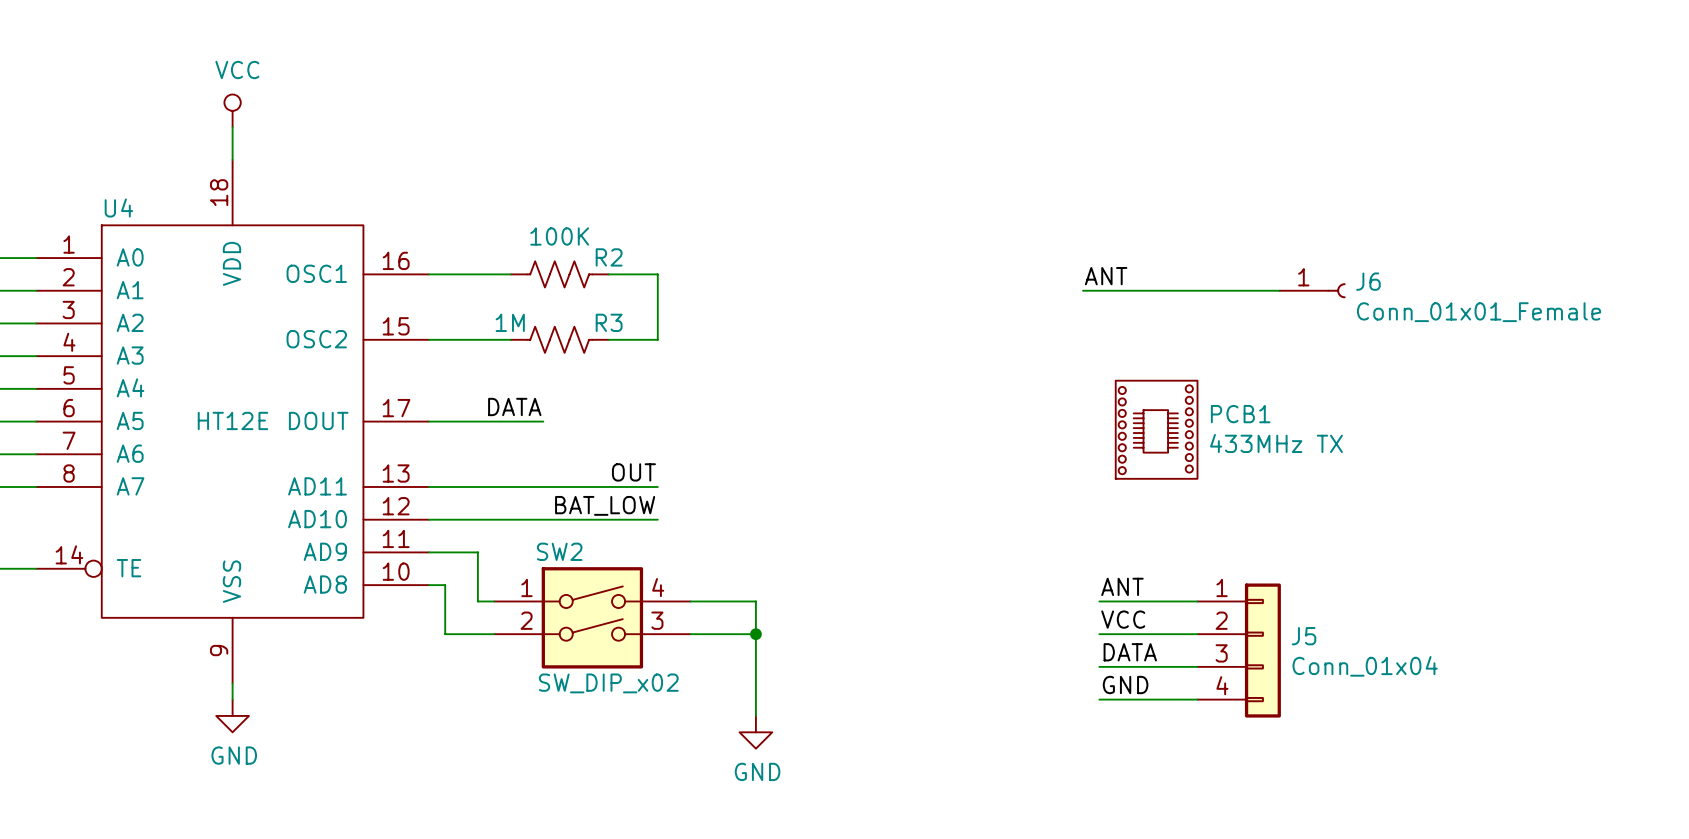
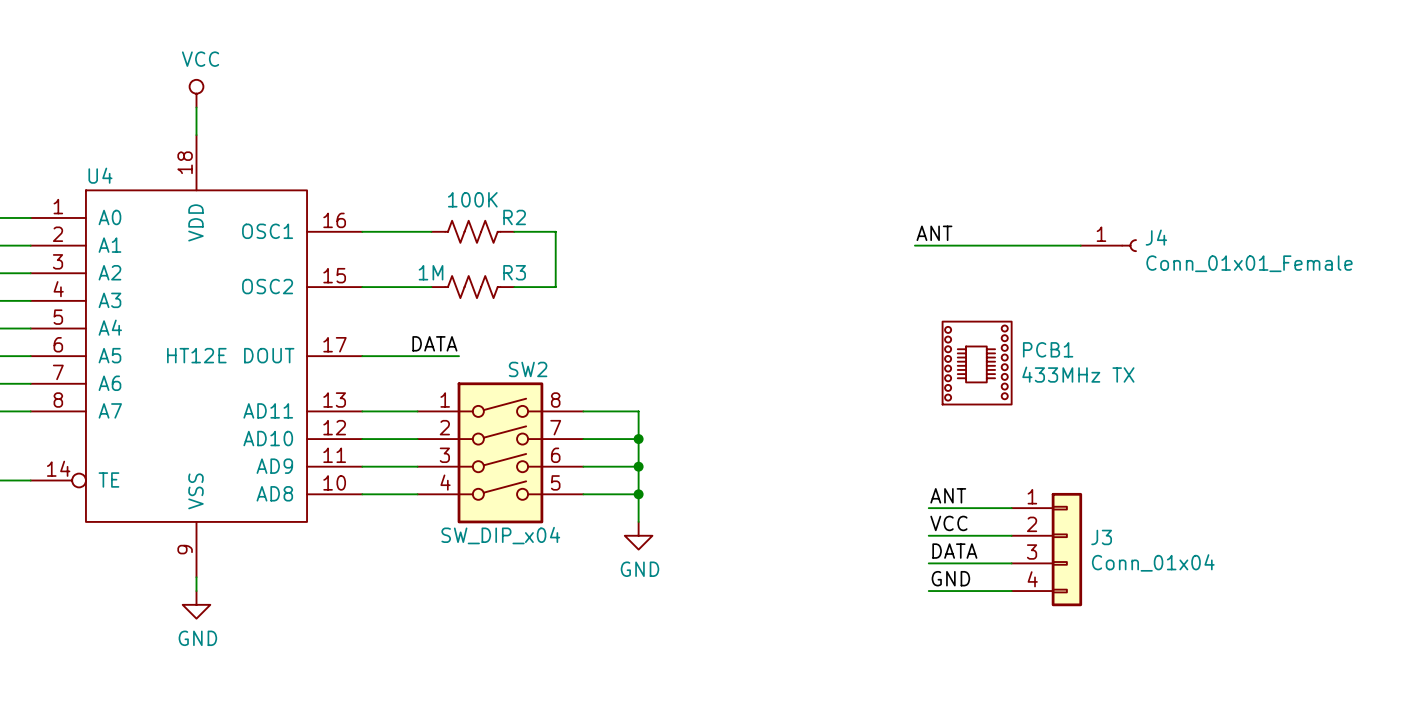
J6 name: J6 (1368, 281) -> J4 (1156, 237)
label: OUT (633, 472) -> none
label: BAT_LOW (605, 505) -> none
wire: none -> (583, 439) (638, 439)
junction: none -> (638, 439)
SW2 name position: SW2 (559, 551) -> SW2 (528, 369)
wire: (477, 552) (477, 601) (494, 601) -> (403, 466) (417, 466)
wire: none -> (583, 466) (638, 466)
junction: none -> (638, 466)
SW2 symbol: [494, 567, 691, 669] -> [417, 382, 584, 524]
wire: (445, 585) (445, 634) (494, 634) -> (376, 494) (417, 494)
junction: none -> (638, 494)
wire: (690, 601) (755, 601) -> (583, 411) (638, 411) (638, 508)
wire: (755, 617) (755, 715) -> none
wire: (690, 634) (755, 634) -> (583, 494) (638, 494)
junction: (755, 634) -> none
J5 name: J5 (1304, 636) -> J3 (1101, 537)
SW2 value: SW_DIP_x02 (608, 683) -> SW_DIP_x04 (500, 535)
power symbol position: GND (755, 732) -> GND (638, 535)

